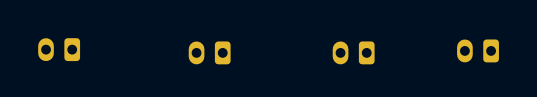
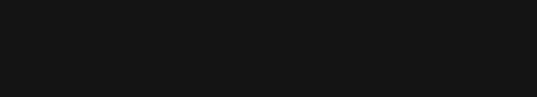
part: (59, 49) -> none
part: (478, 50) -> none
part: (209, 52) -> none
part: (353, 52) -> none

